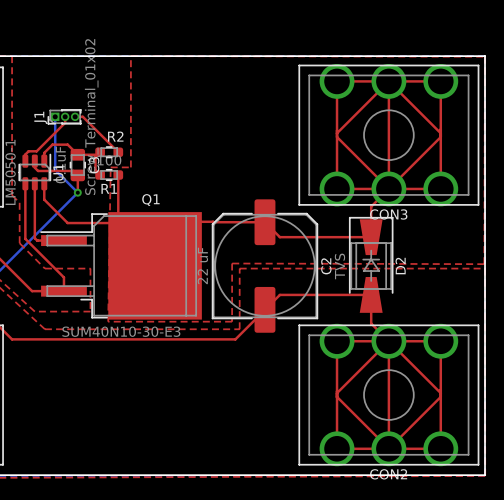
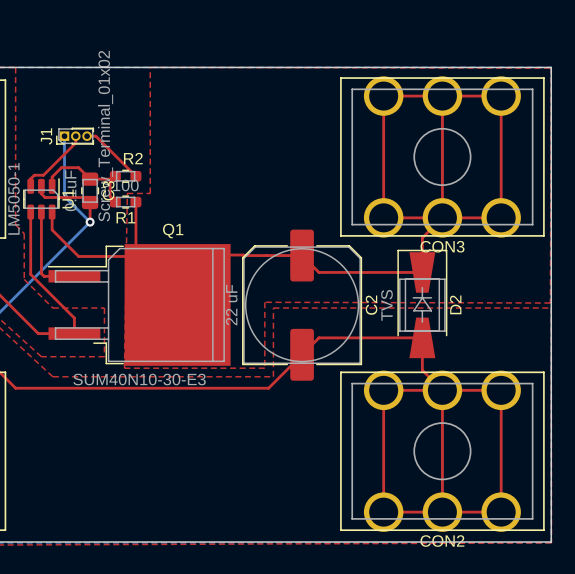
top track: (337, 133) (388, 81) (440, 133) -> none
top track: (337, 137) (388, 188) (440, 137) -> none
top track: (337, 393) (388, 341) (440, 393) -> none
top track: (337, 396) (388, 448) (440, 396) -> none

